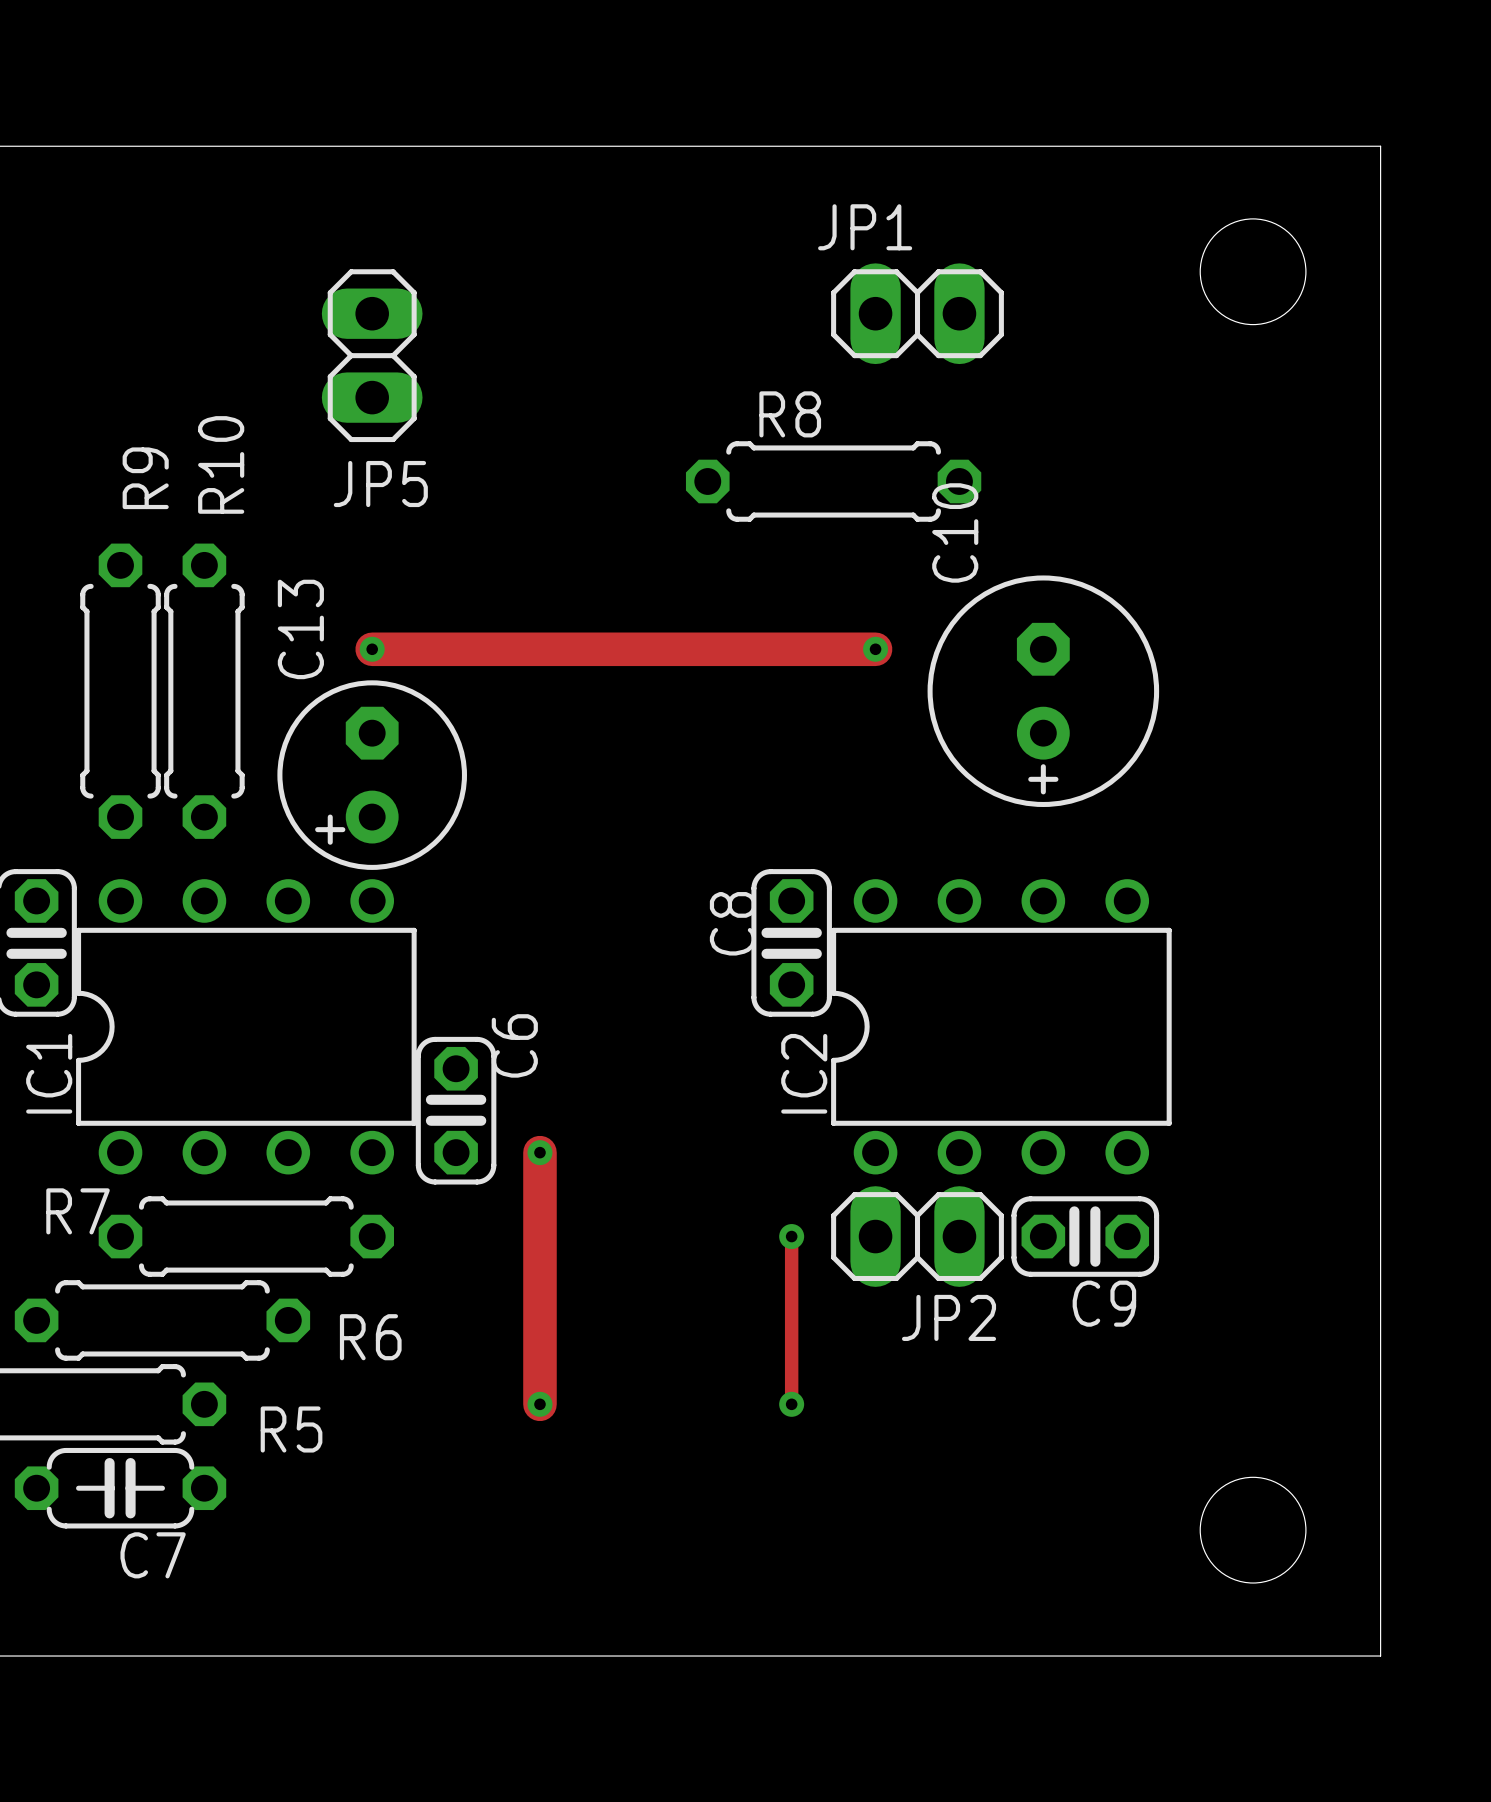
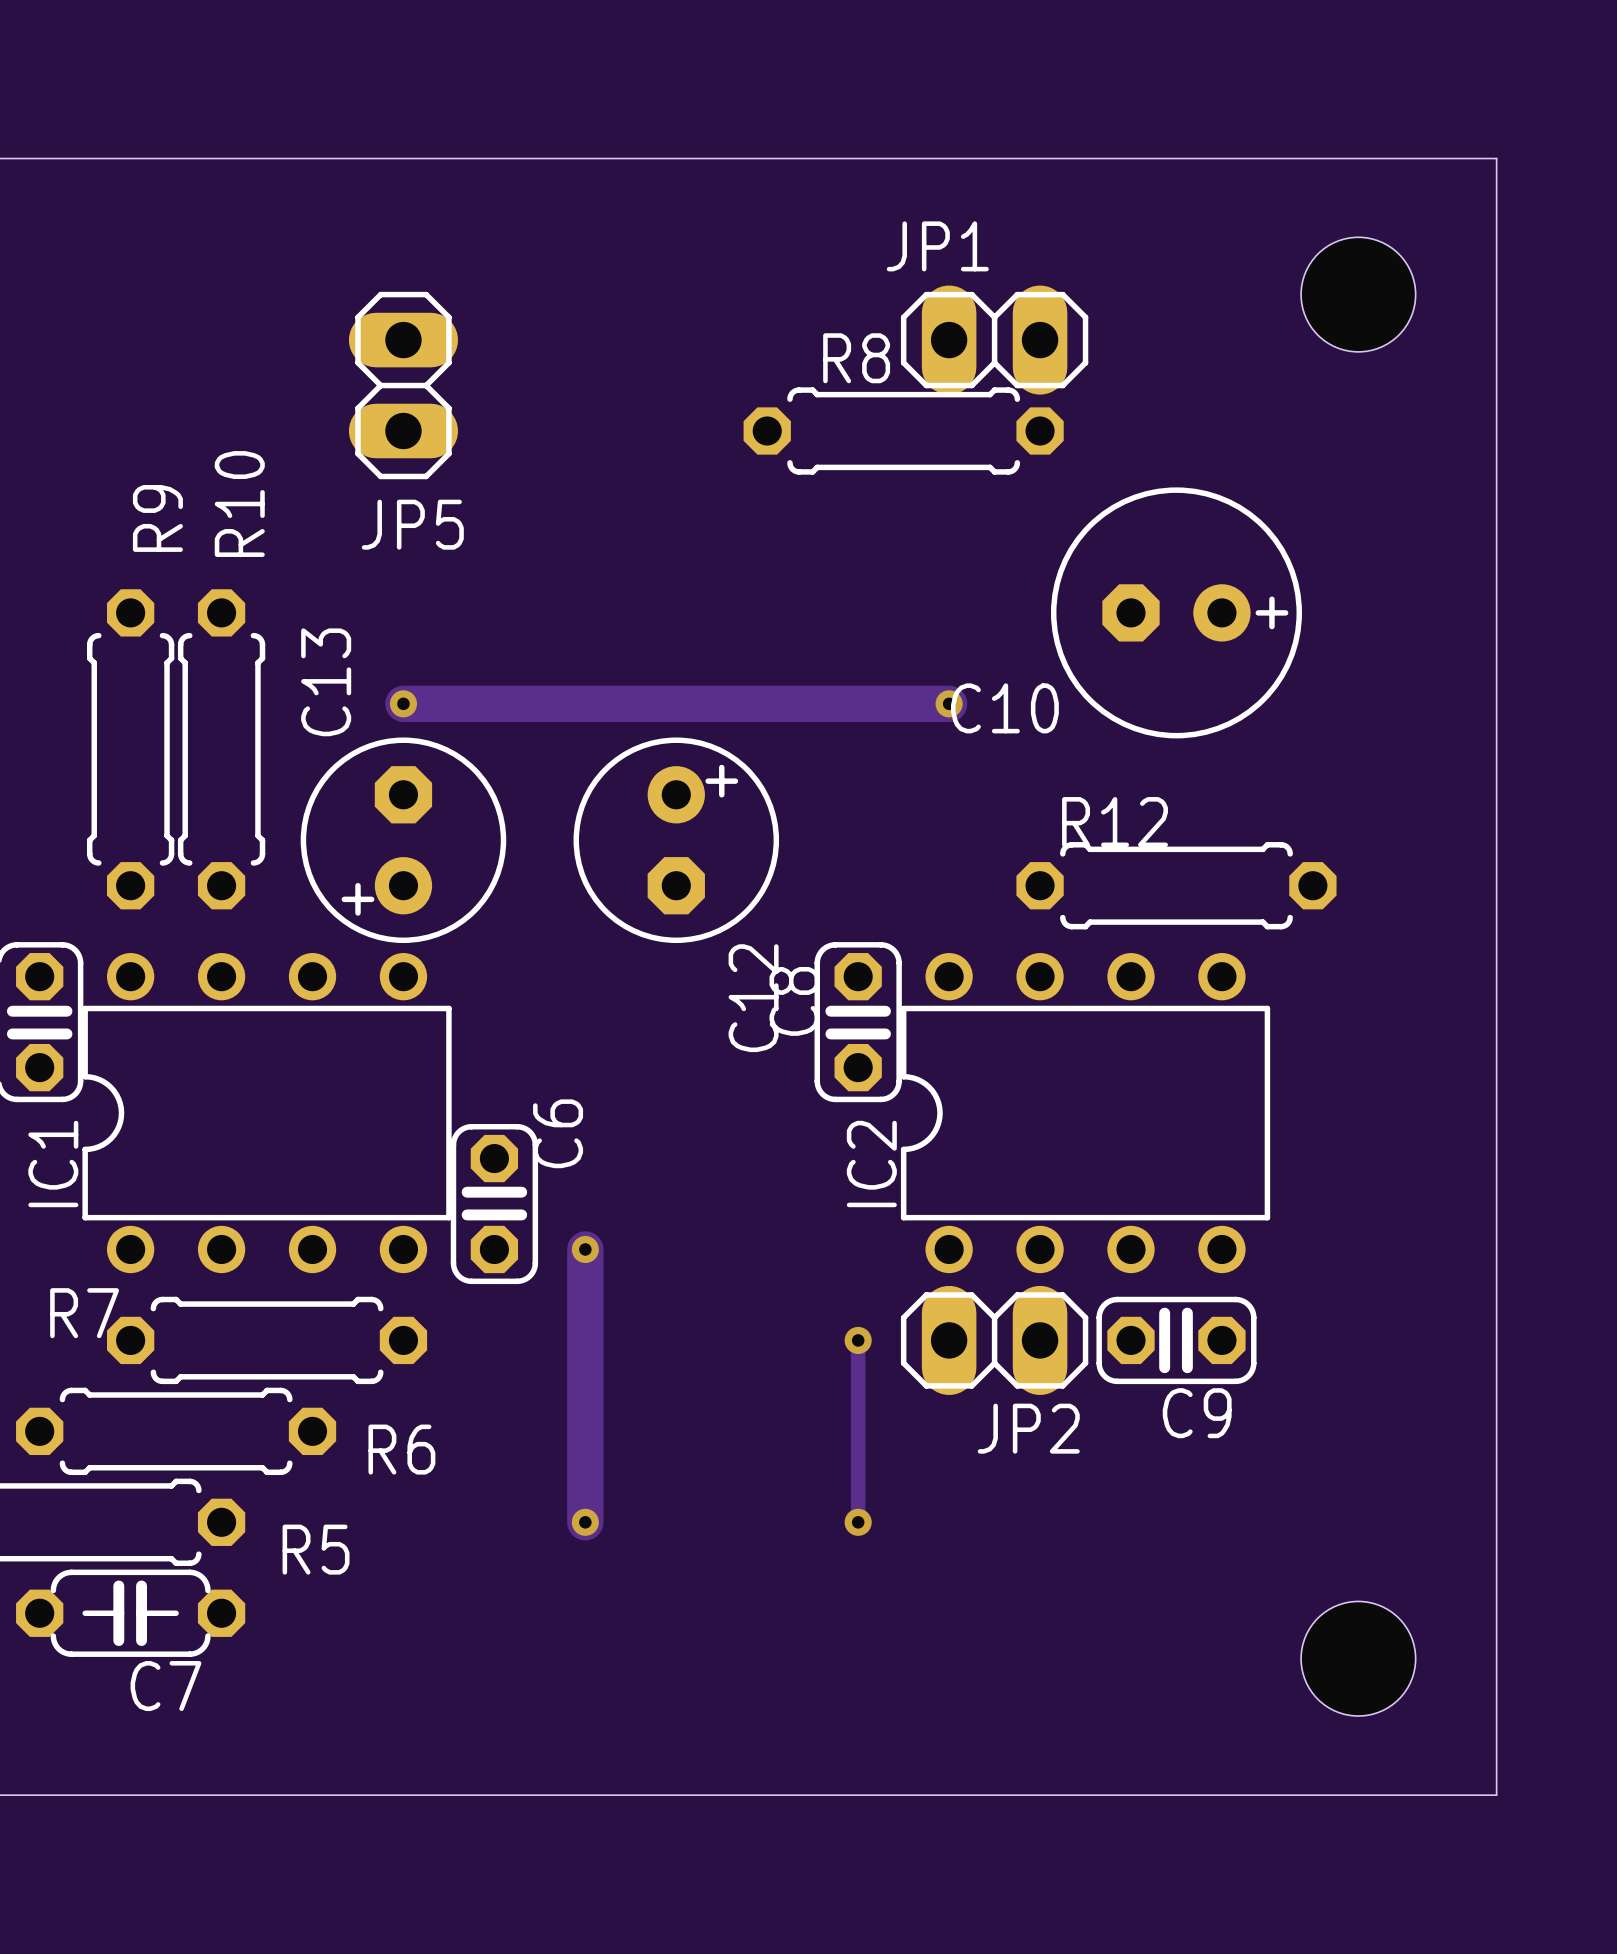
R8 position: (833, 481) -> (903, 431)
C10 rotation: 0° (1043, 691) -> 90° counterclockwise (1176, 612)
C12: none -> (676, 840)
R12: none -> (1176, 885)

